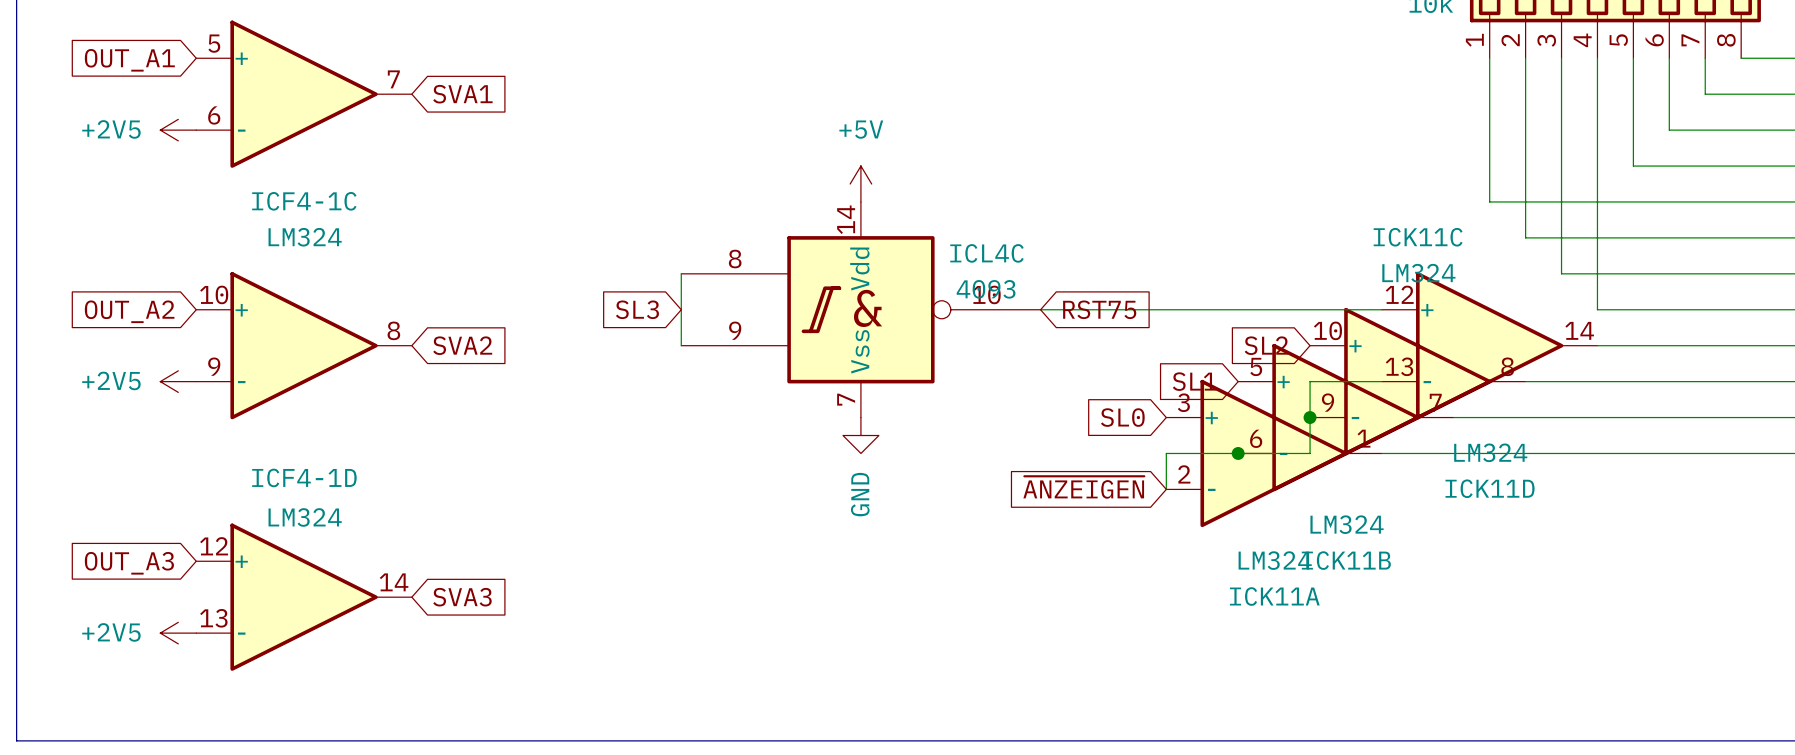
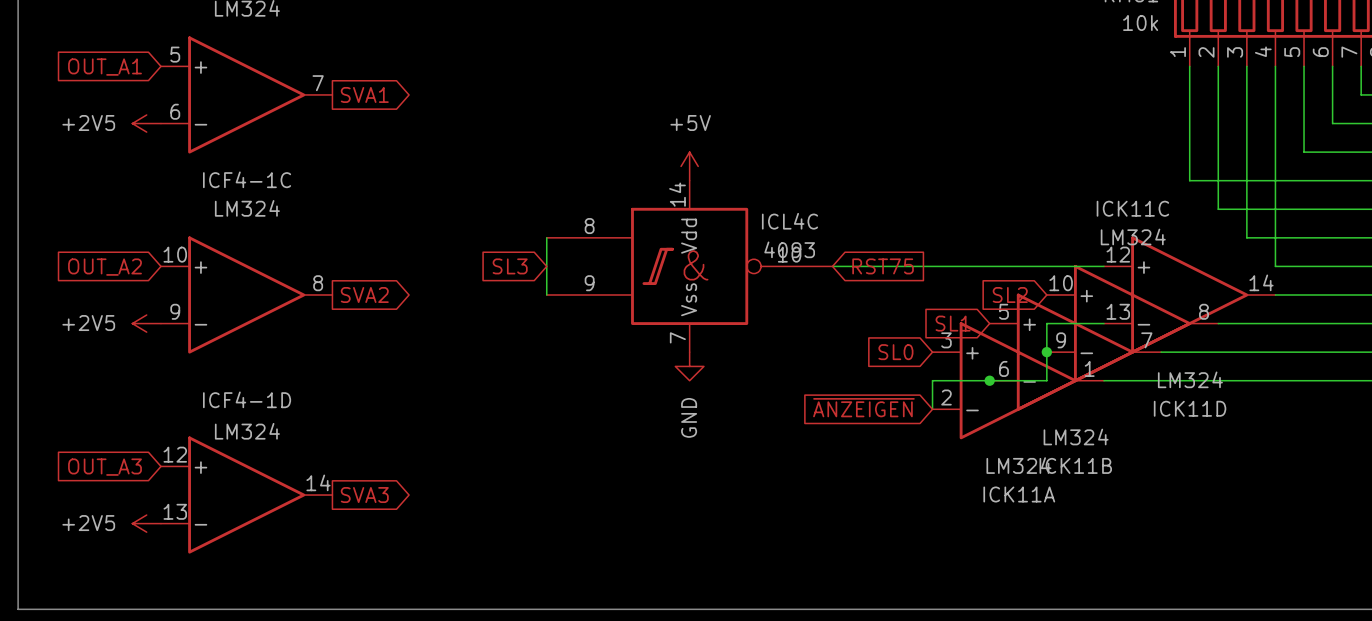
global label shape: input (462, 94) -> output (364, 94)
global label shape: input (462, 345) -> output (364, 294)
global label shape: input (462, 597) -> output (364, 495)

